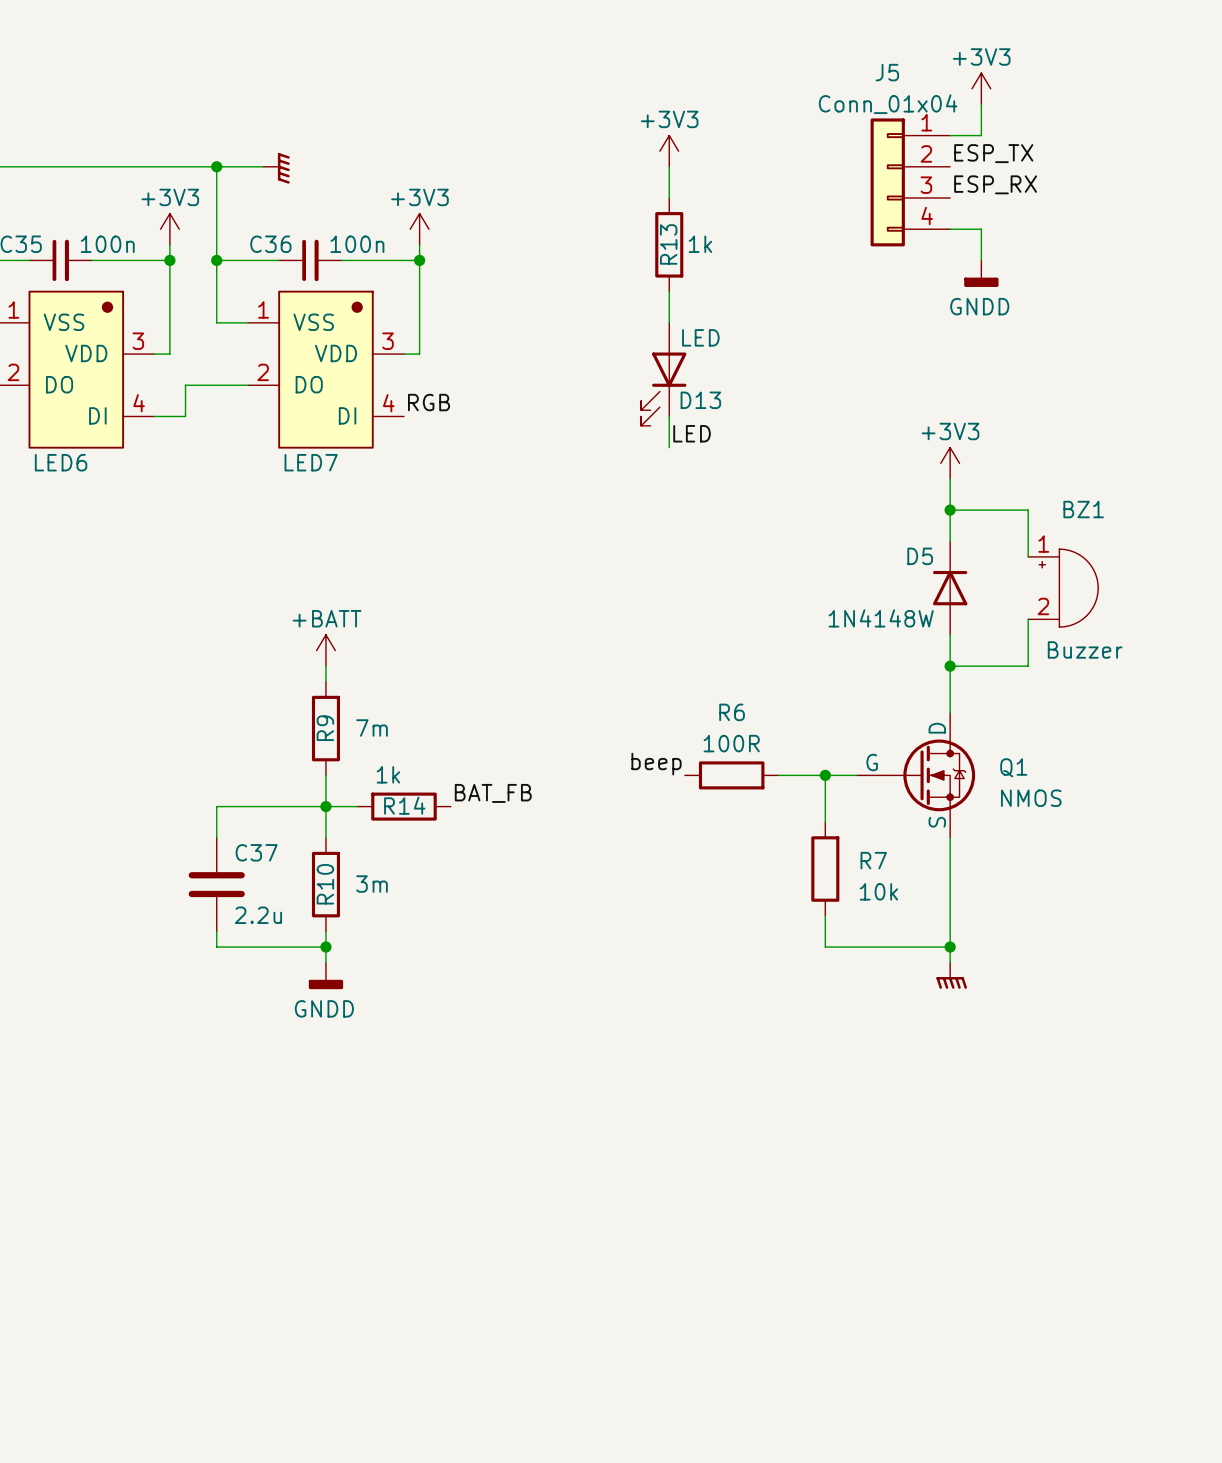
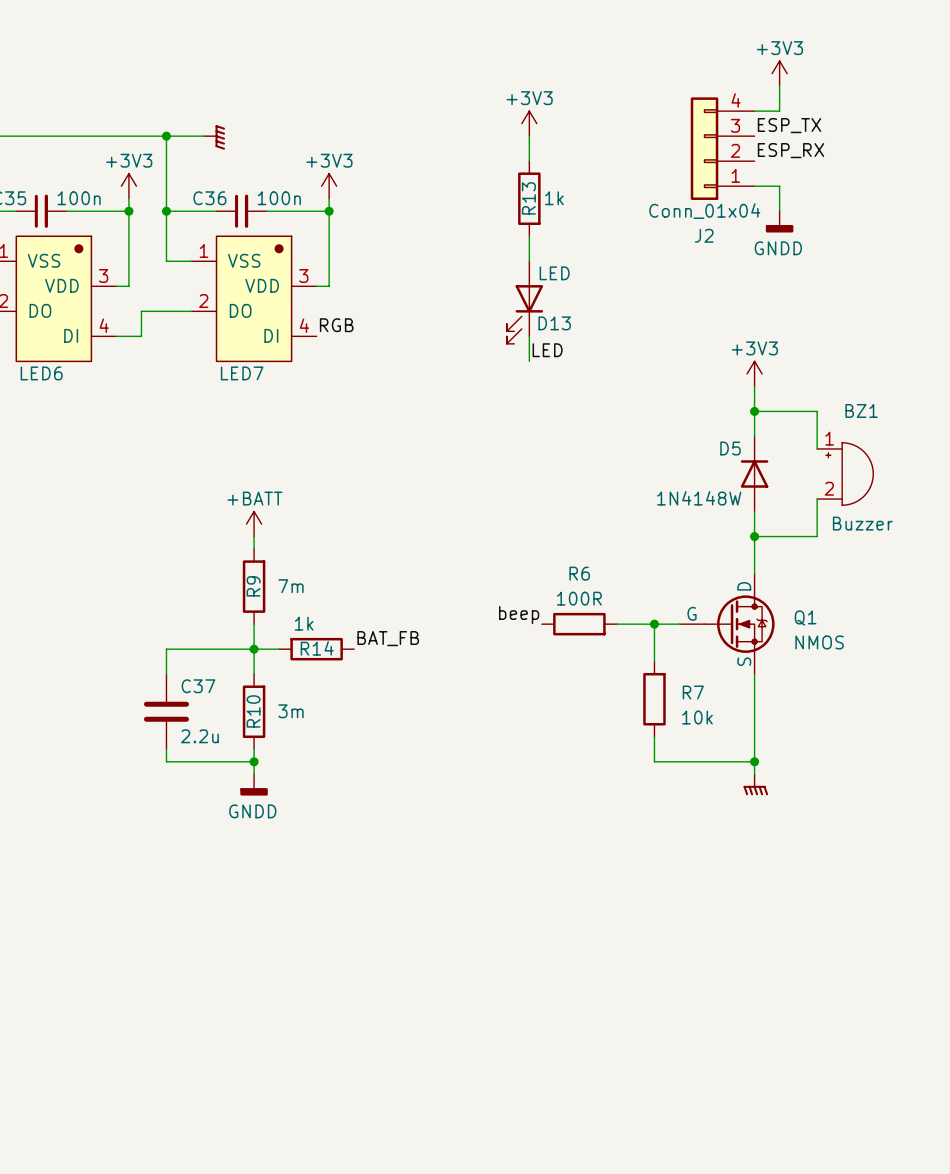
J5 name: J5 (887, 72) -> J2 (704, 235)
J5 flip: as is (887, 182) -> up-down (704, 148)

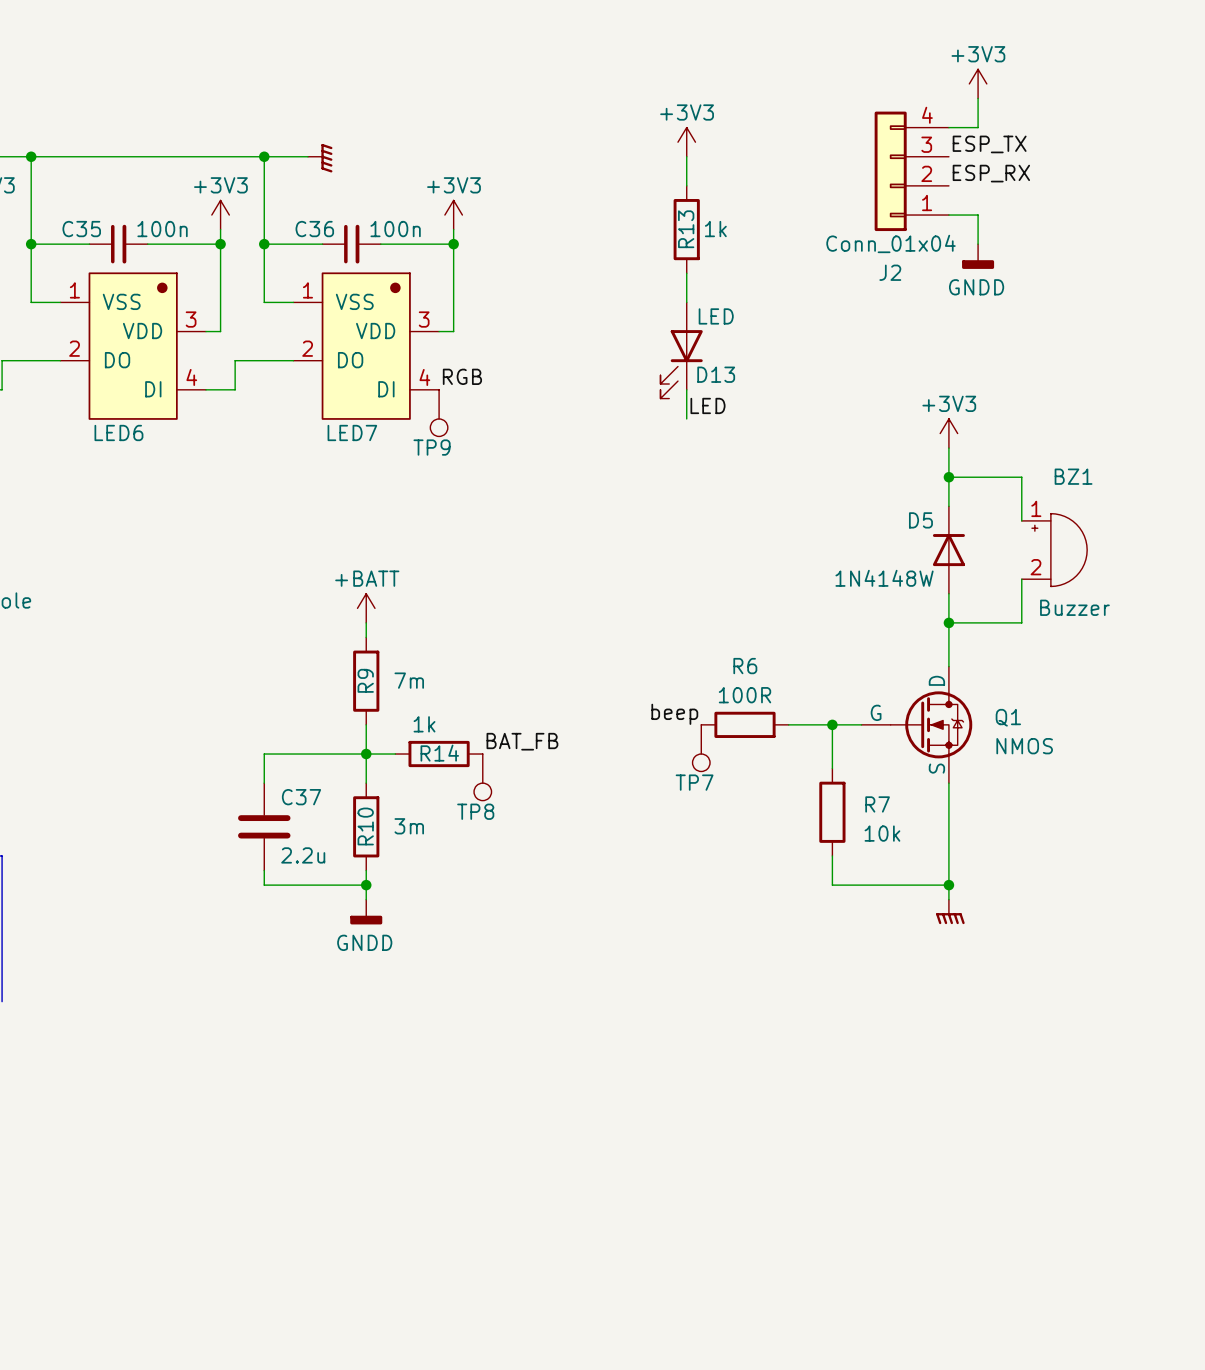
TP9: none -> (439, 413)
TP7: none -> (701, 748)
TP8: none -> (482, 777)

